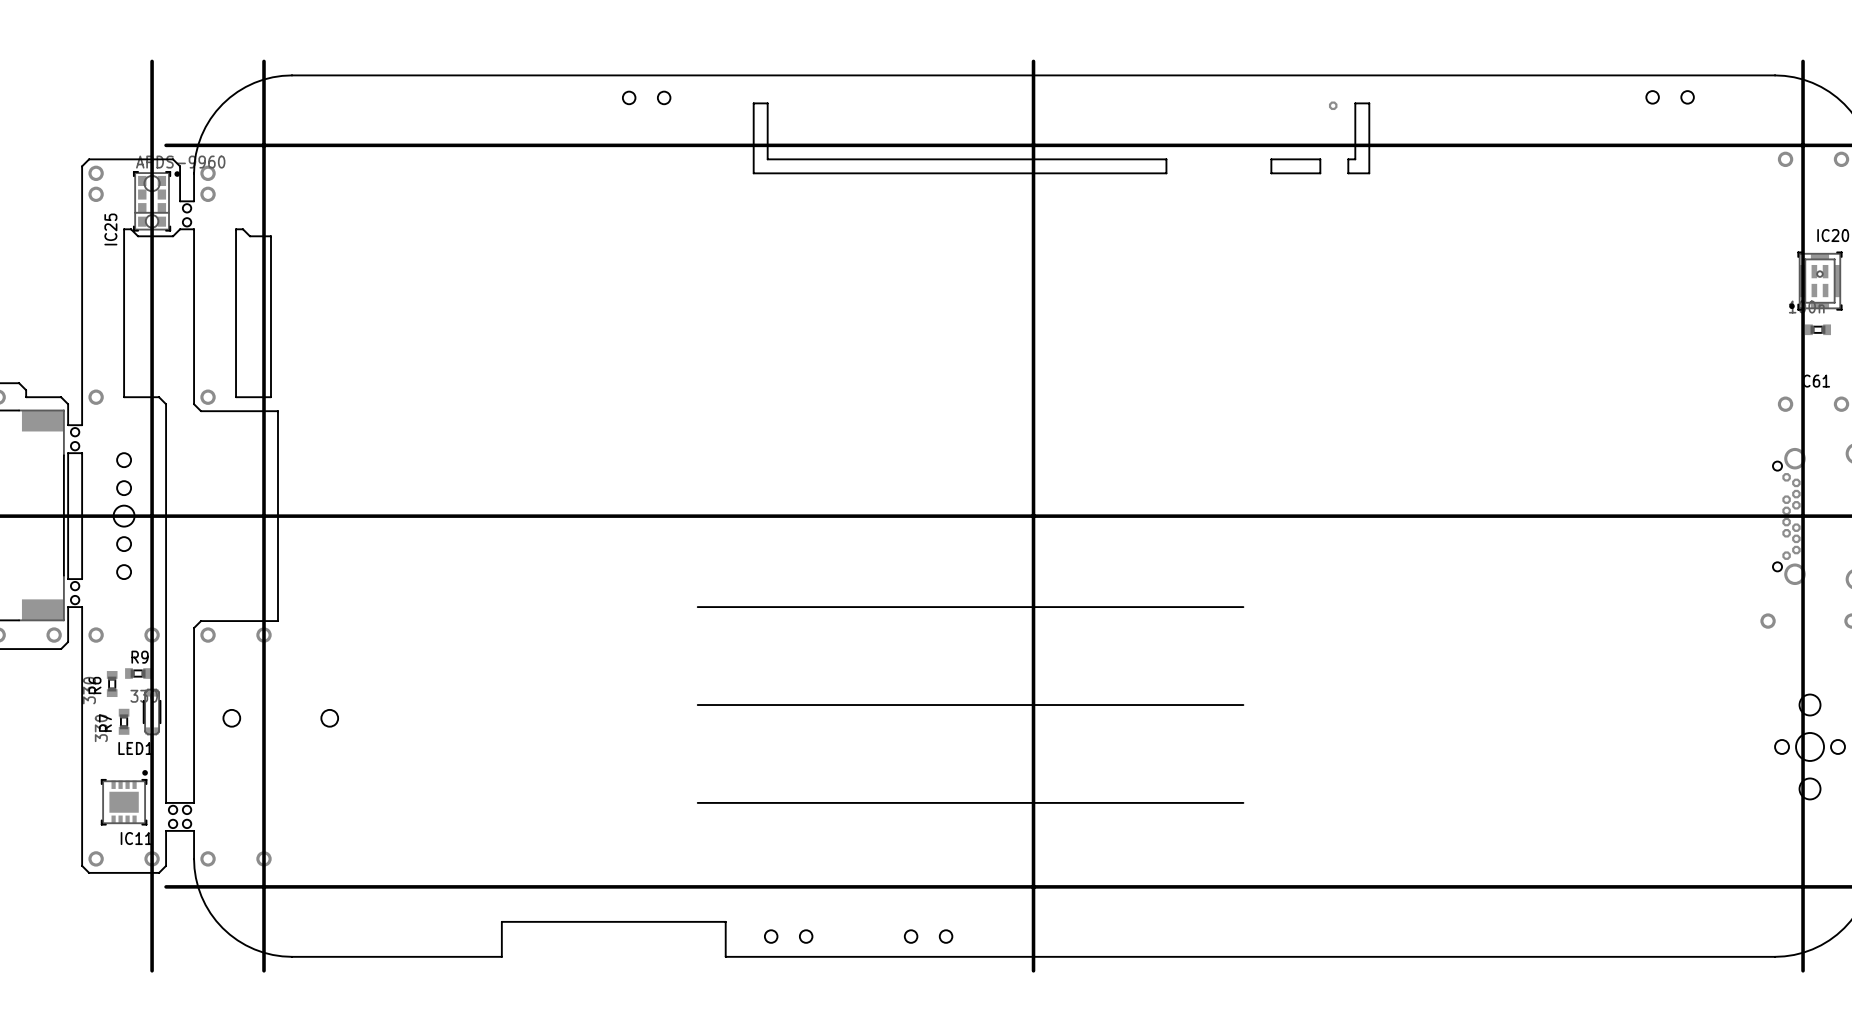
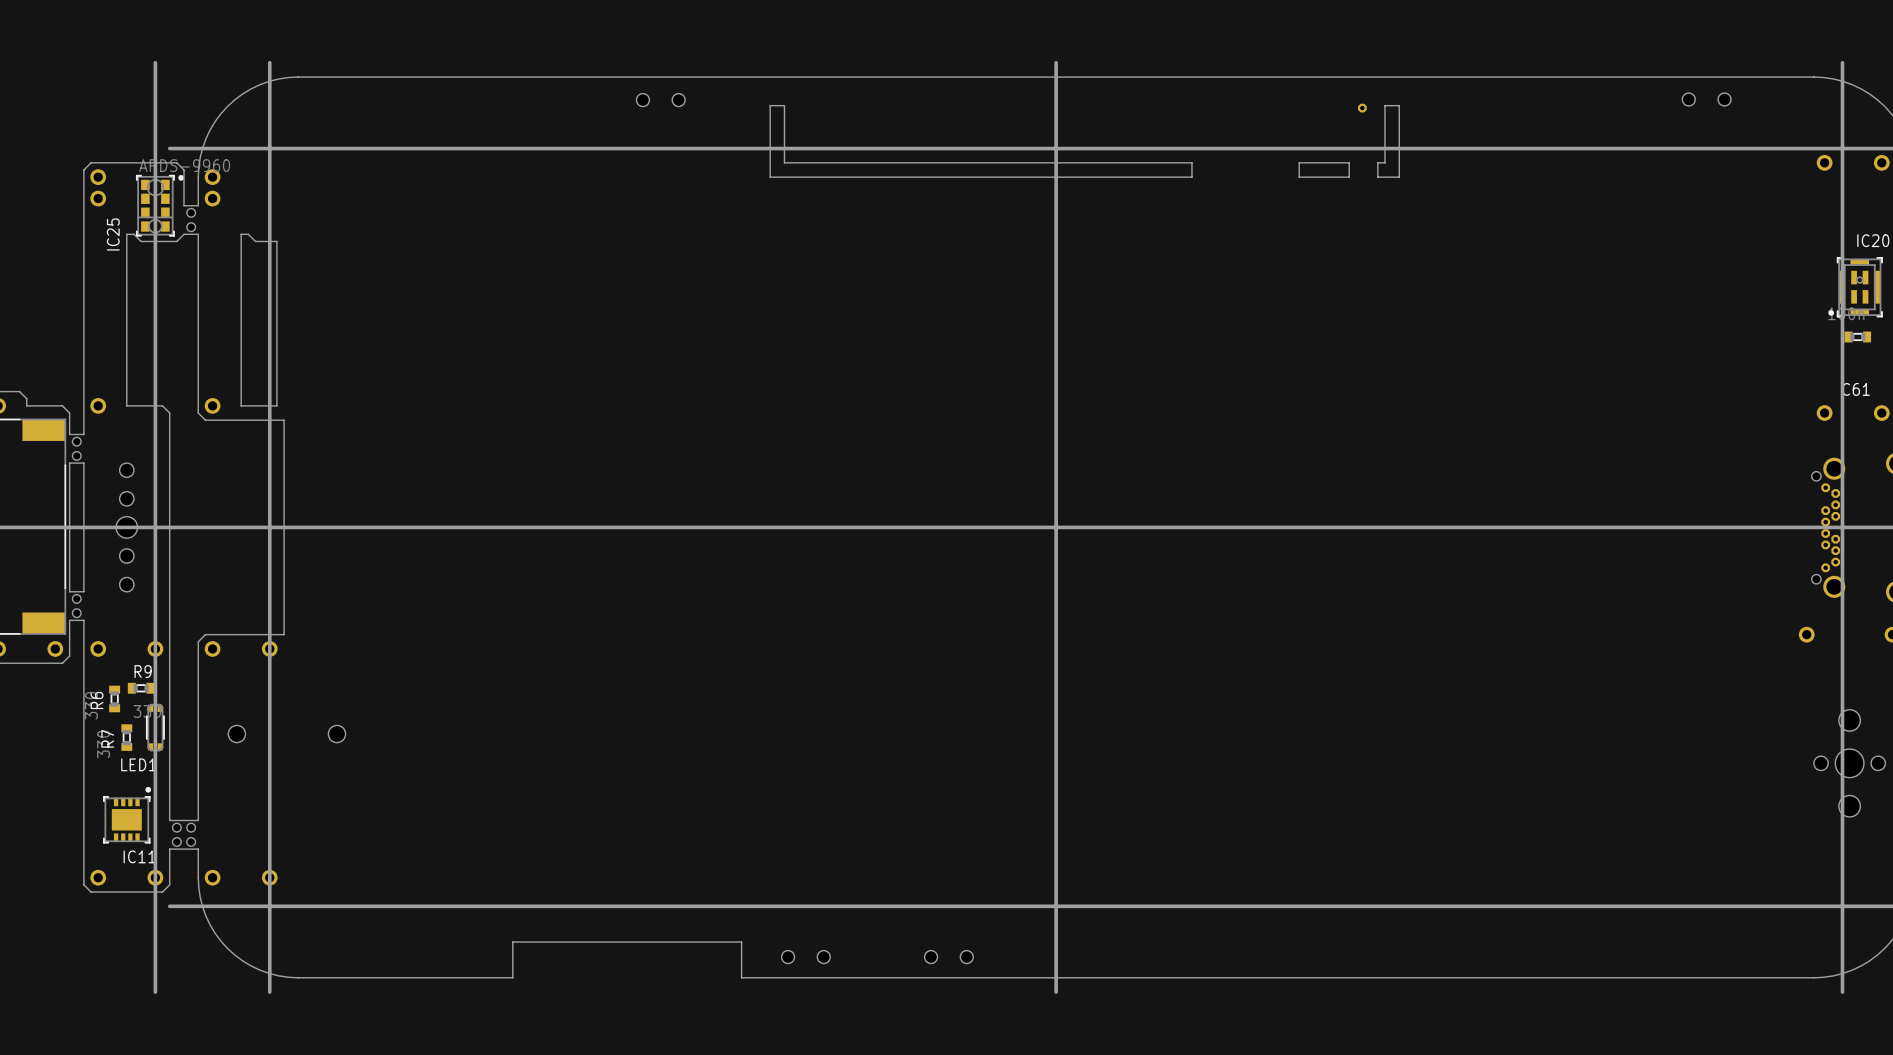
board edge: (1243, 607) (697, 607) -> none
board edge: (1243, 705) (697, 705) -> none
board edge: (1243, 802) (697, 802) -> none

